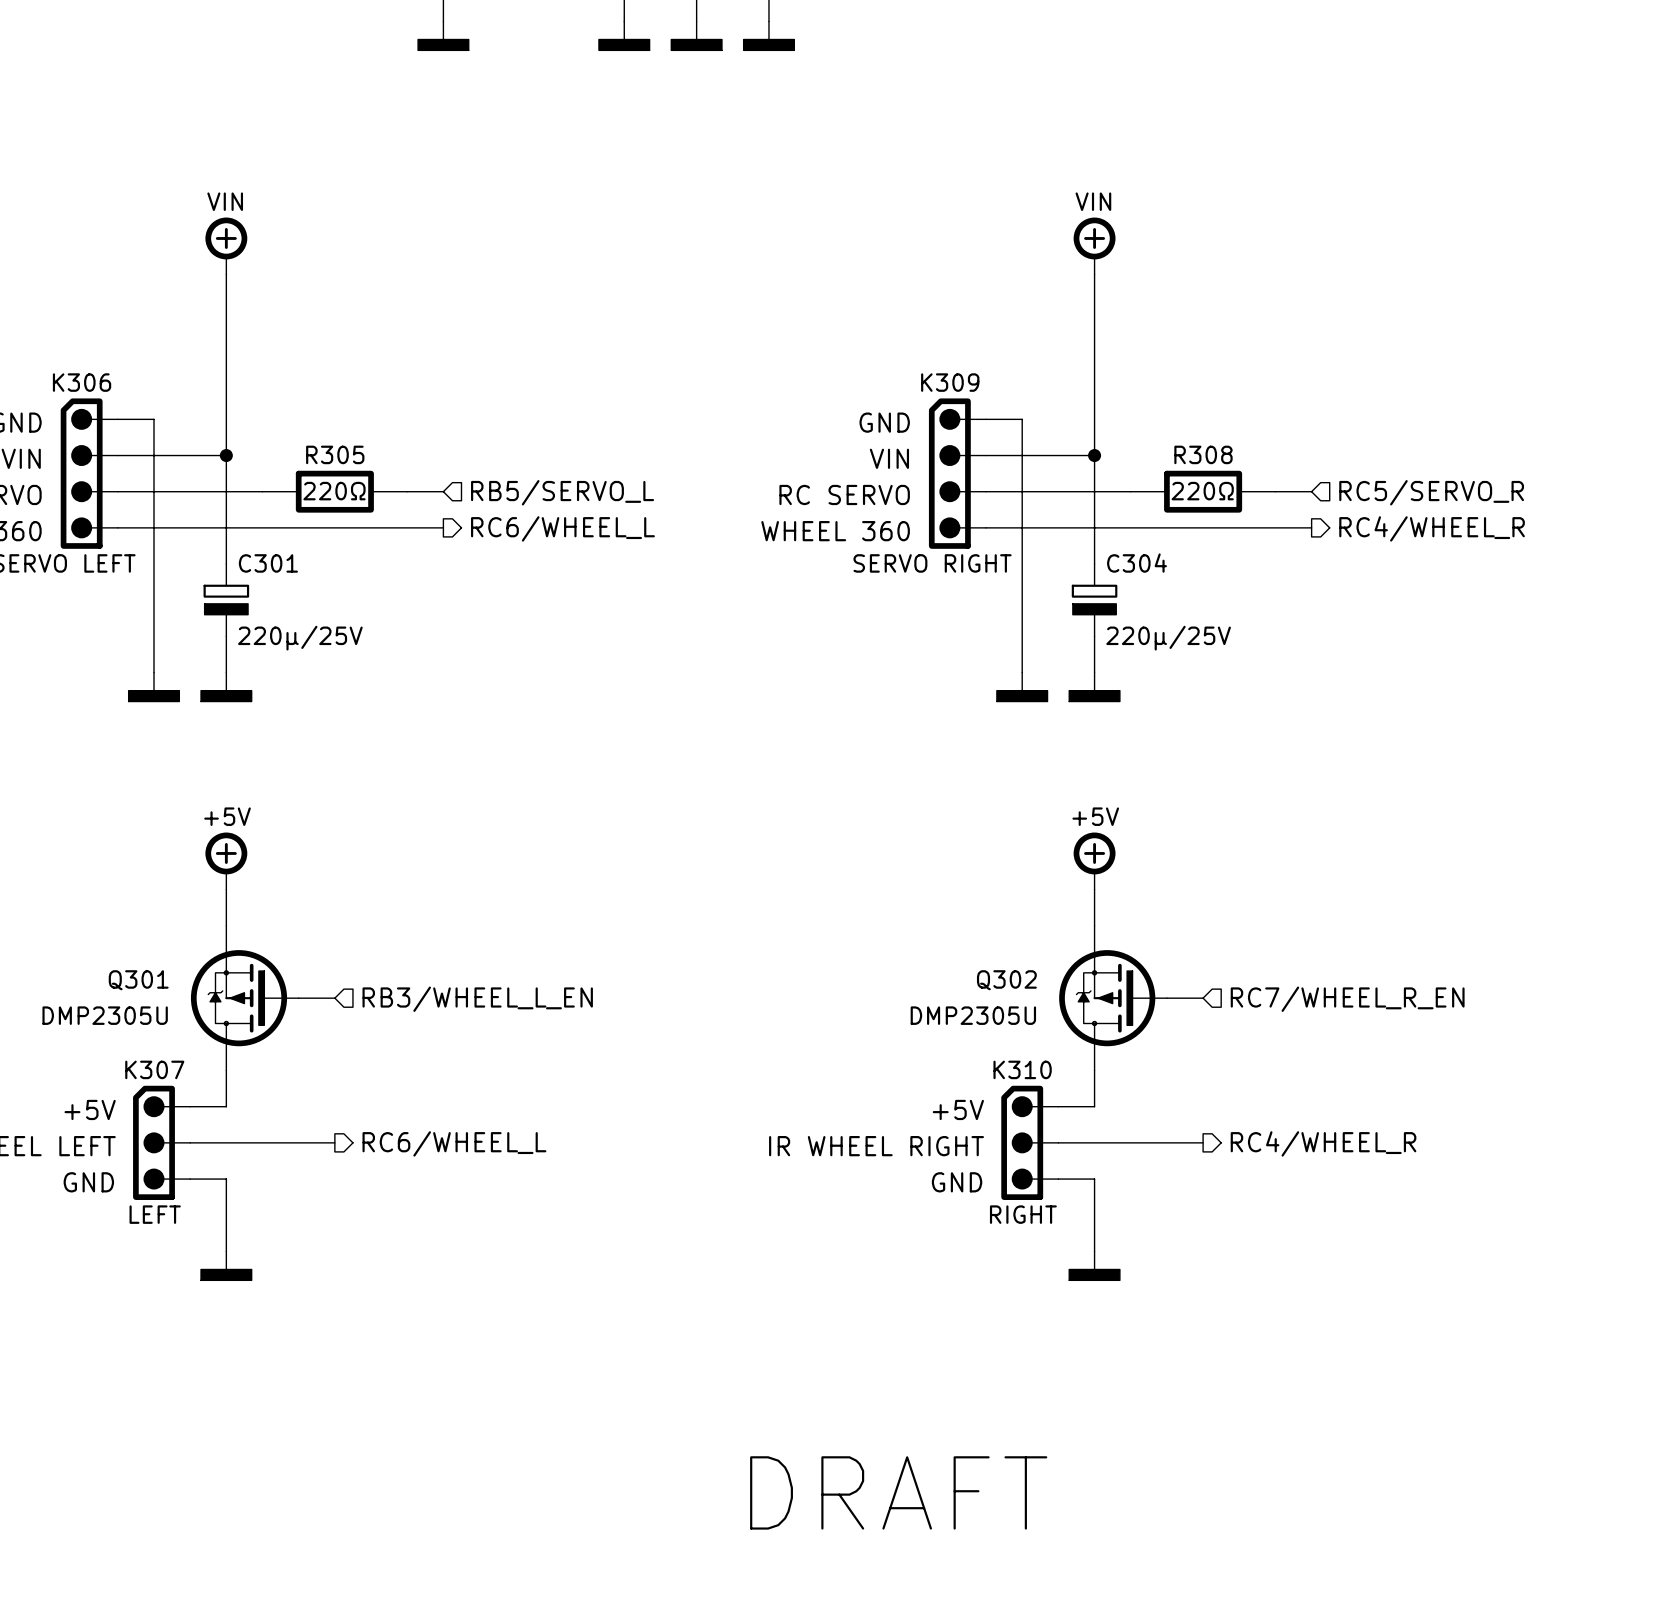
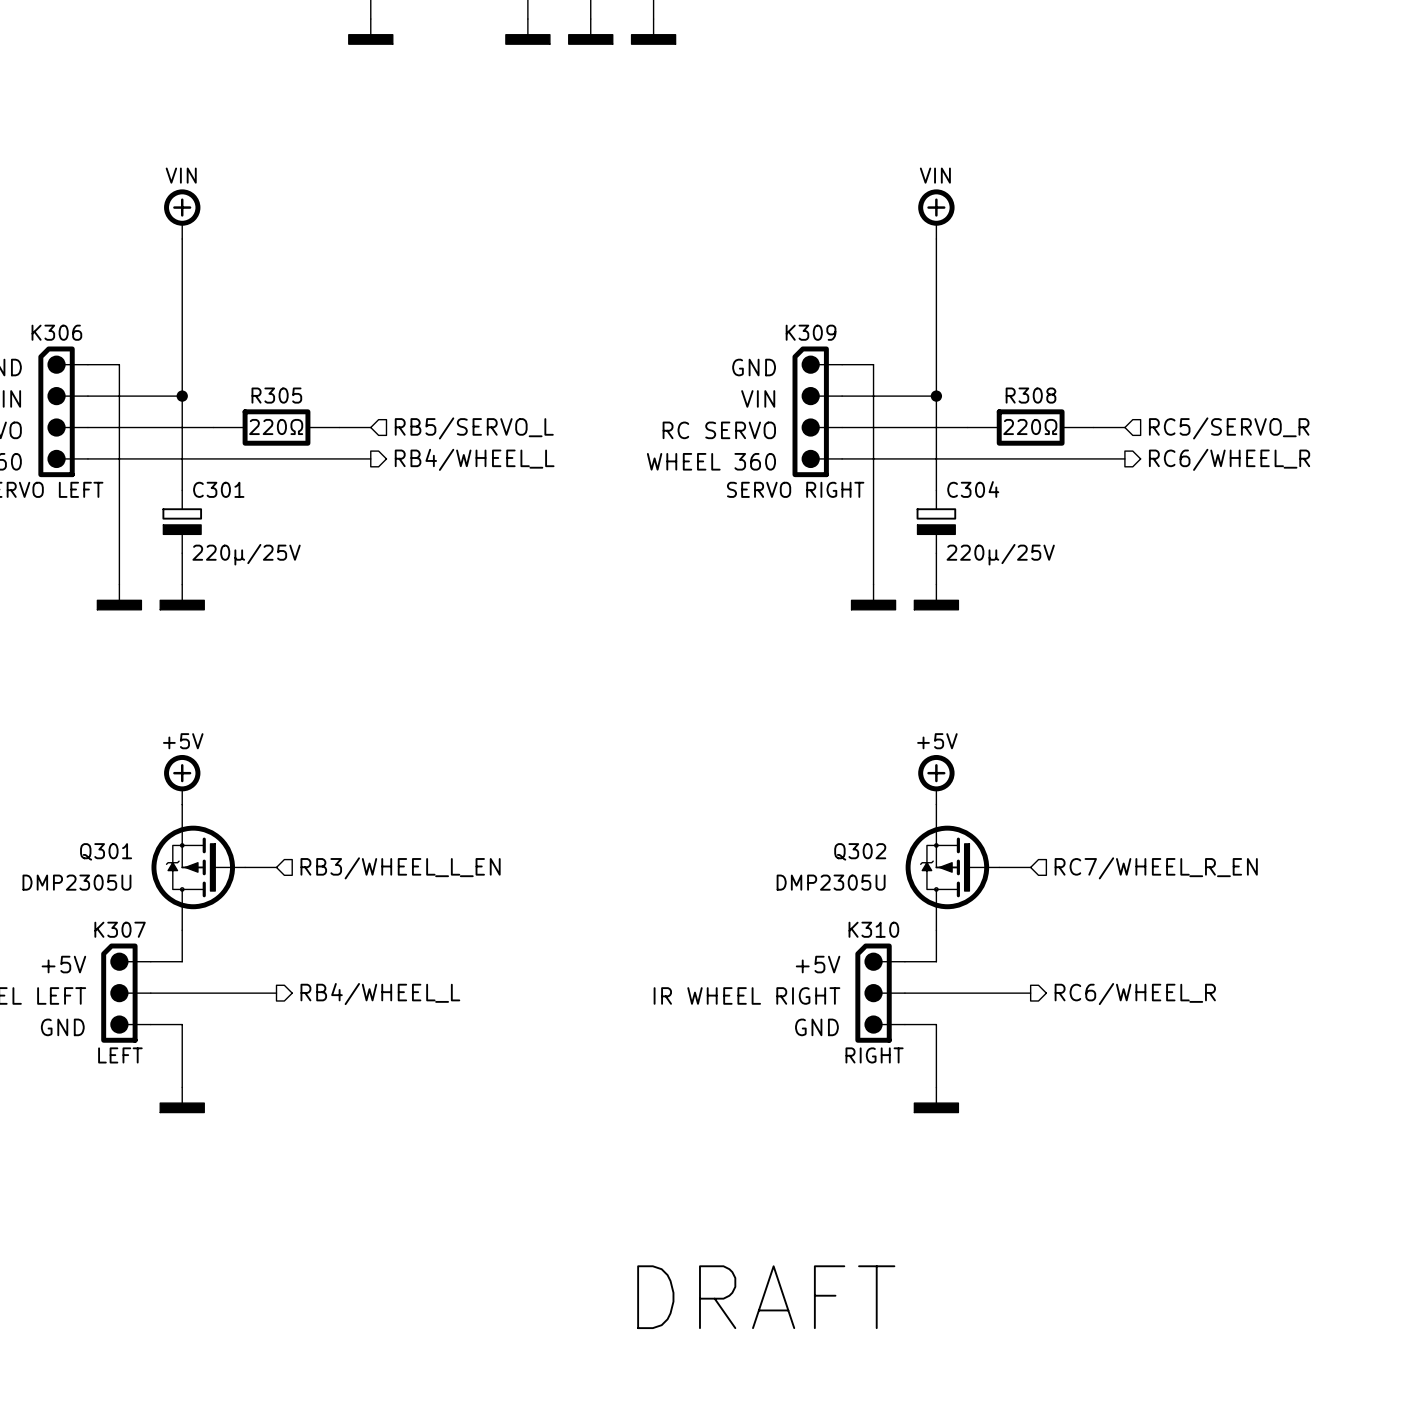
hierarchical label: RC6/WHEEL_L (562, 528) -> RB4/WHEEL_L (474, 459)
hierarchical label: RC4/WHEEL_R (1432, 528) -> RC6/WHEEL_R (1229, 459)
power symbol position: (226, 861) -> (182, 779)
power symbol position: (1094, 861) -> (936, 779)
hierarchical label: RC6/WHEEL_L (454, 1143) -> RB4/WHEEL_L (380, 994)
hierarchical label: RC4/WHEEL_R (1323, 1143) -> RC6/WHEEL_R (1135, 994)

